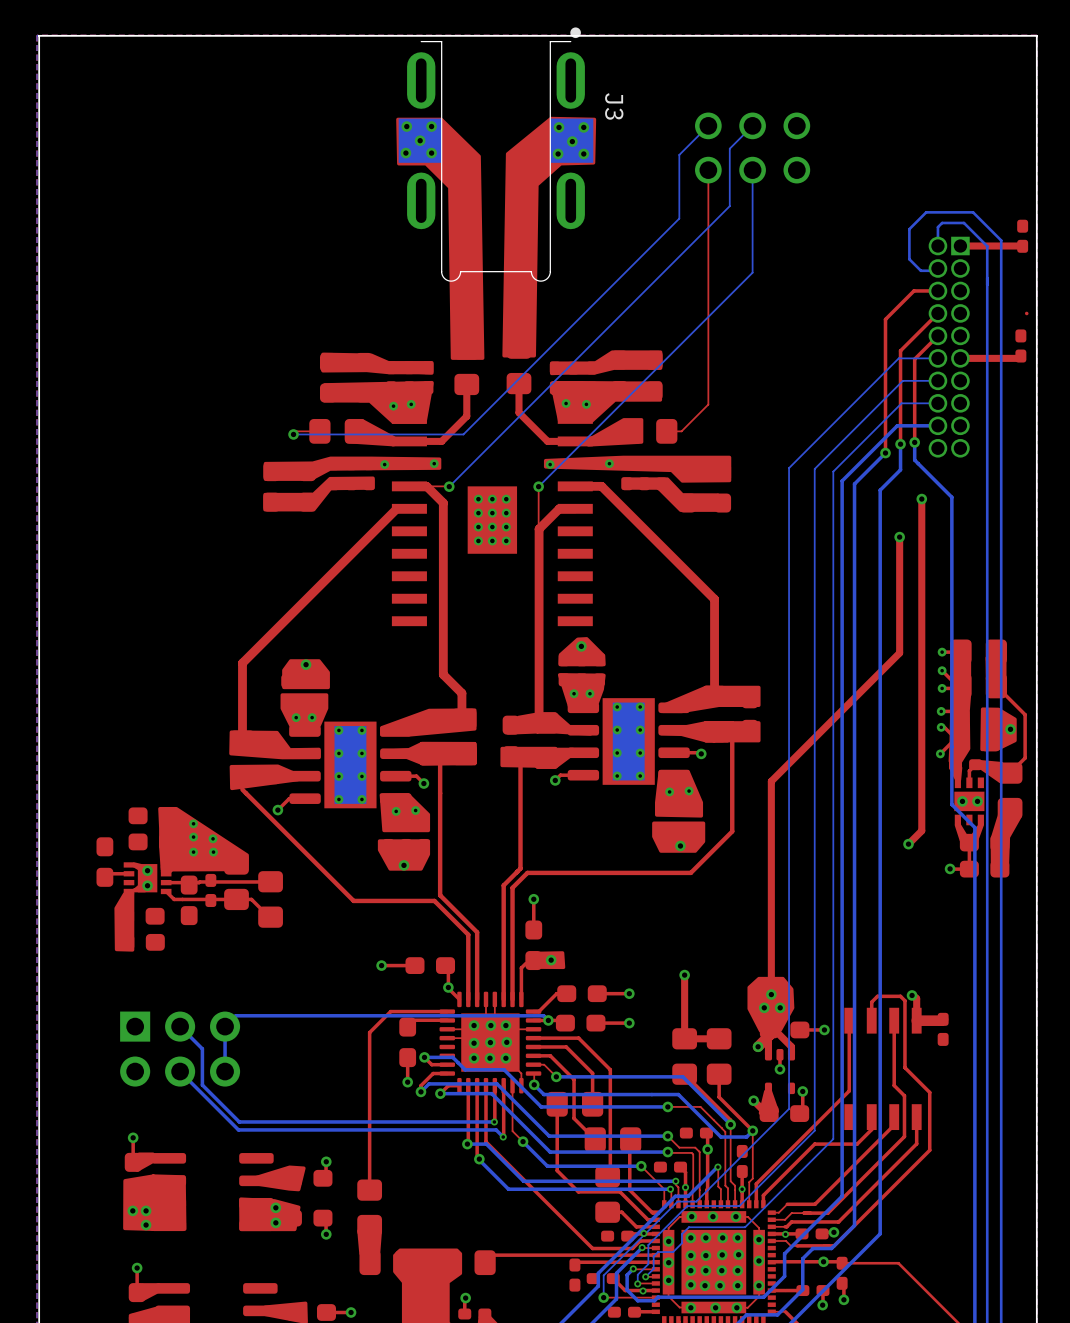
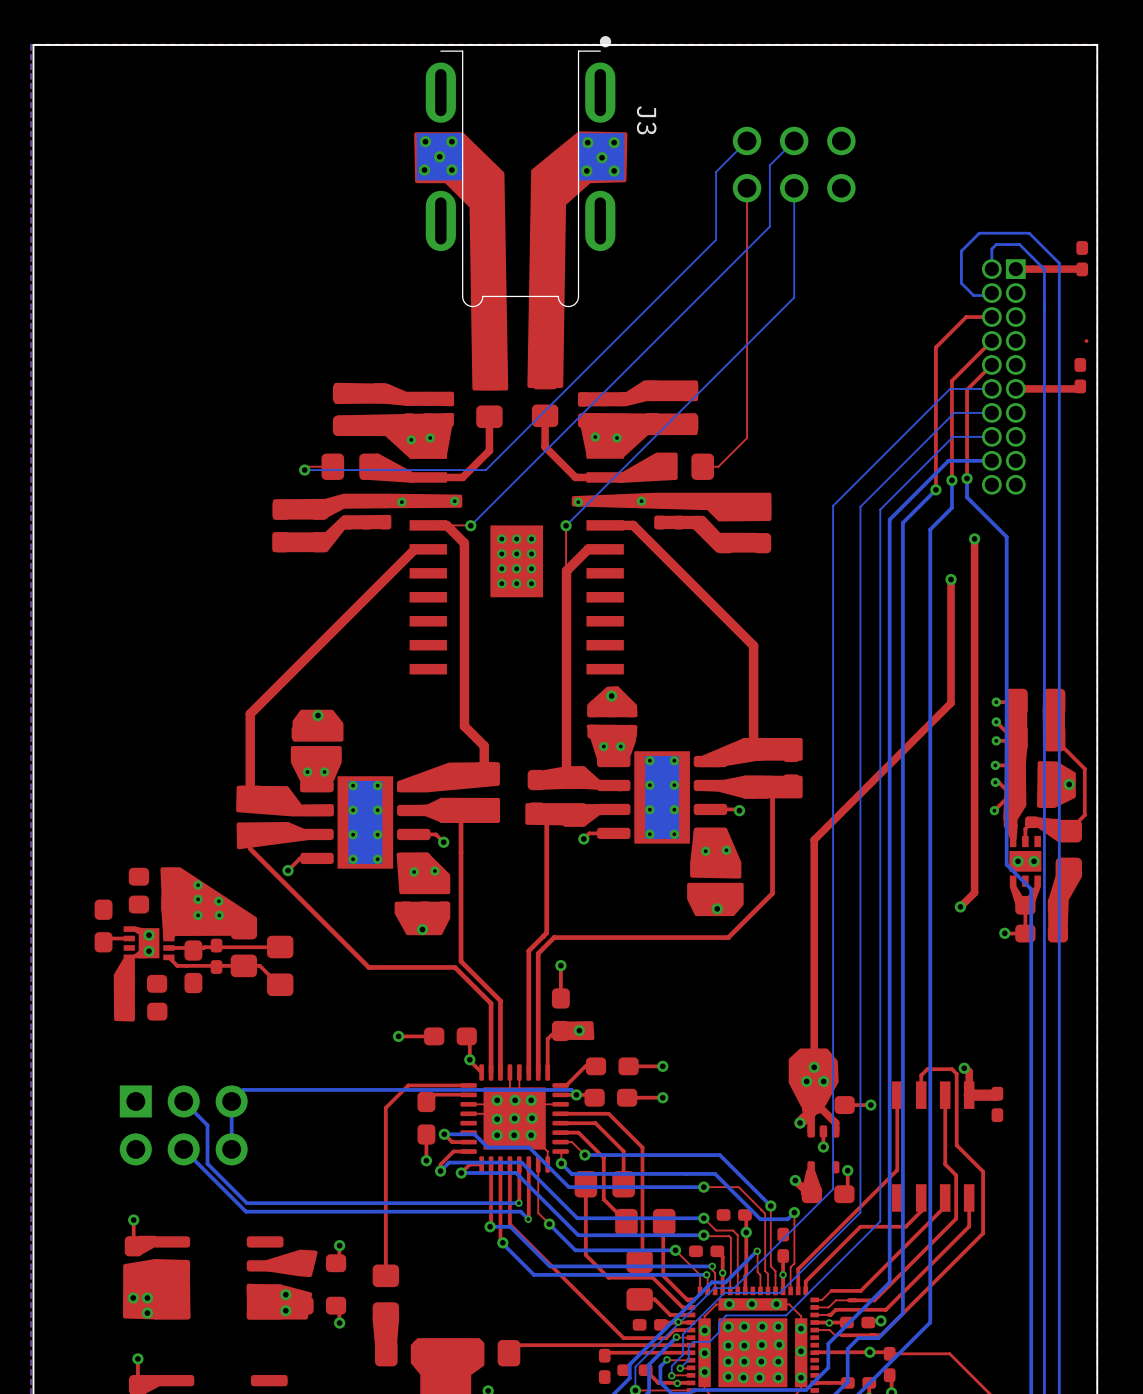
top track: (684, 975) (684, 1038) (719, 1038) -> none
via: (684, 975) -> none
part: (684, 1056) -> none
part: (719, 1056) -> none
top track: (684, 1074) (730, 1120) (730, 1124) -> none
top track: (719, 1074) (719, 1097) (752, 1130) -> none

